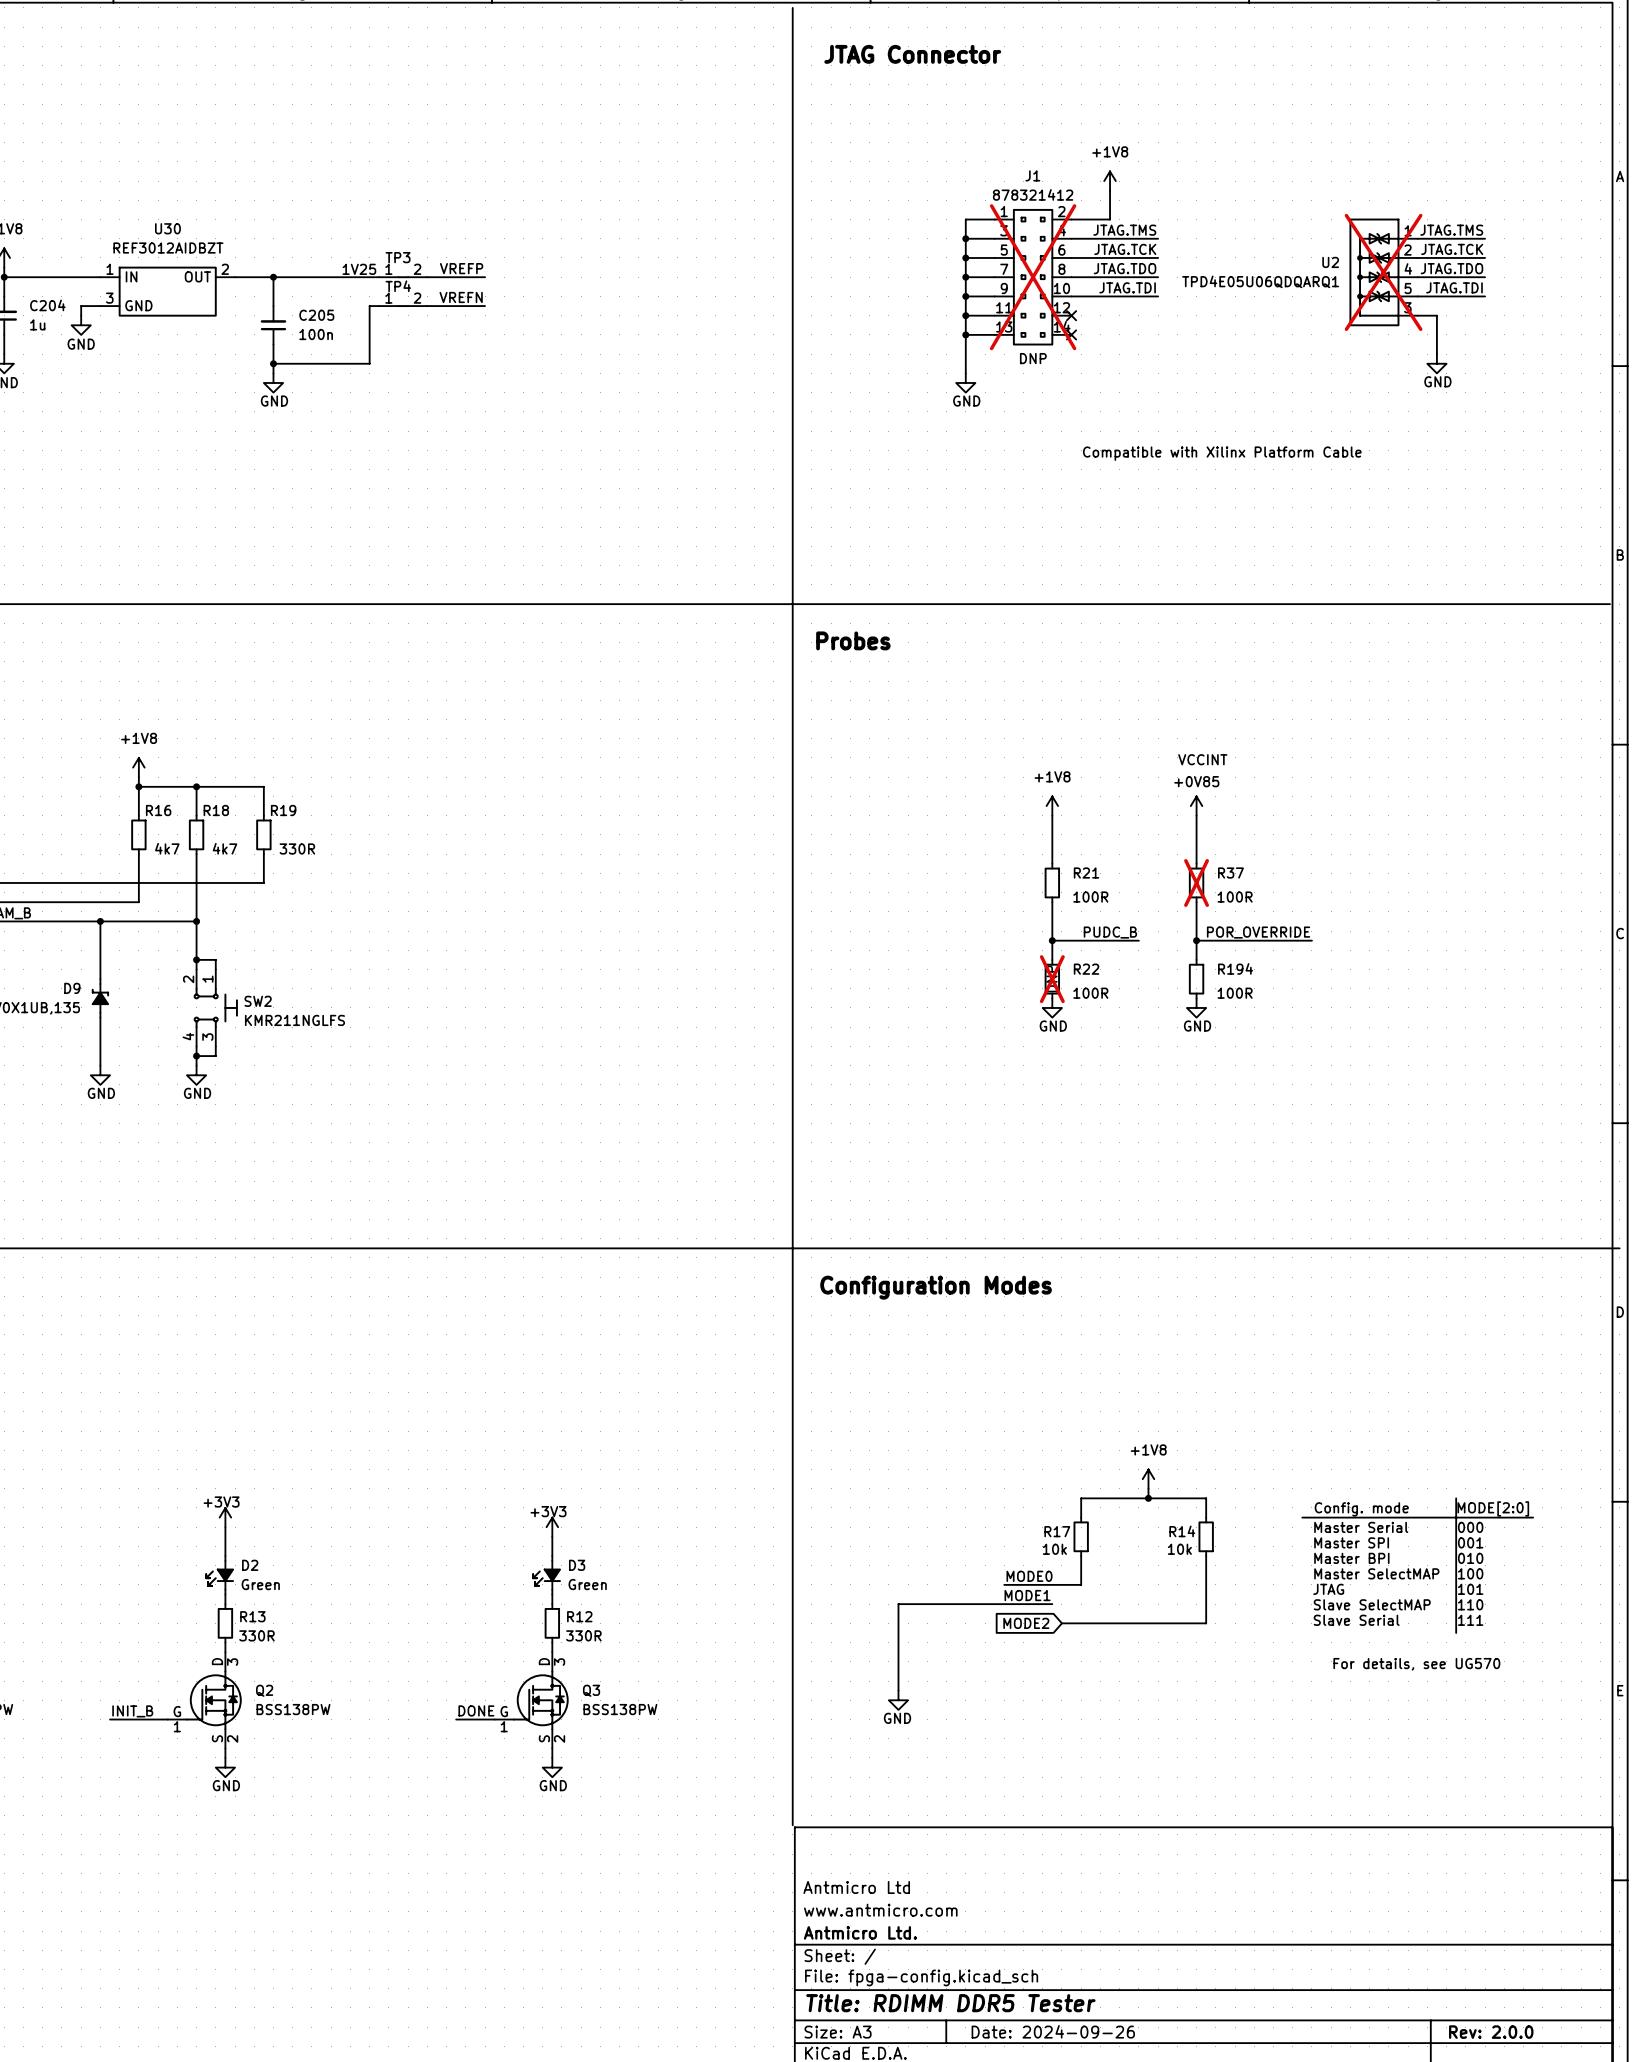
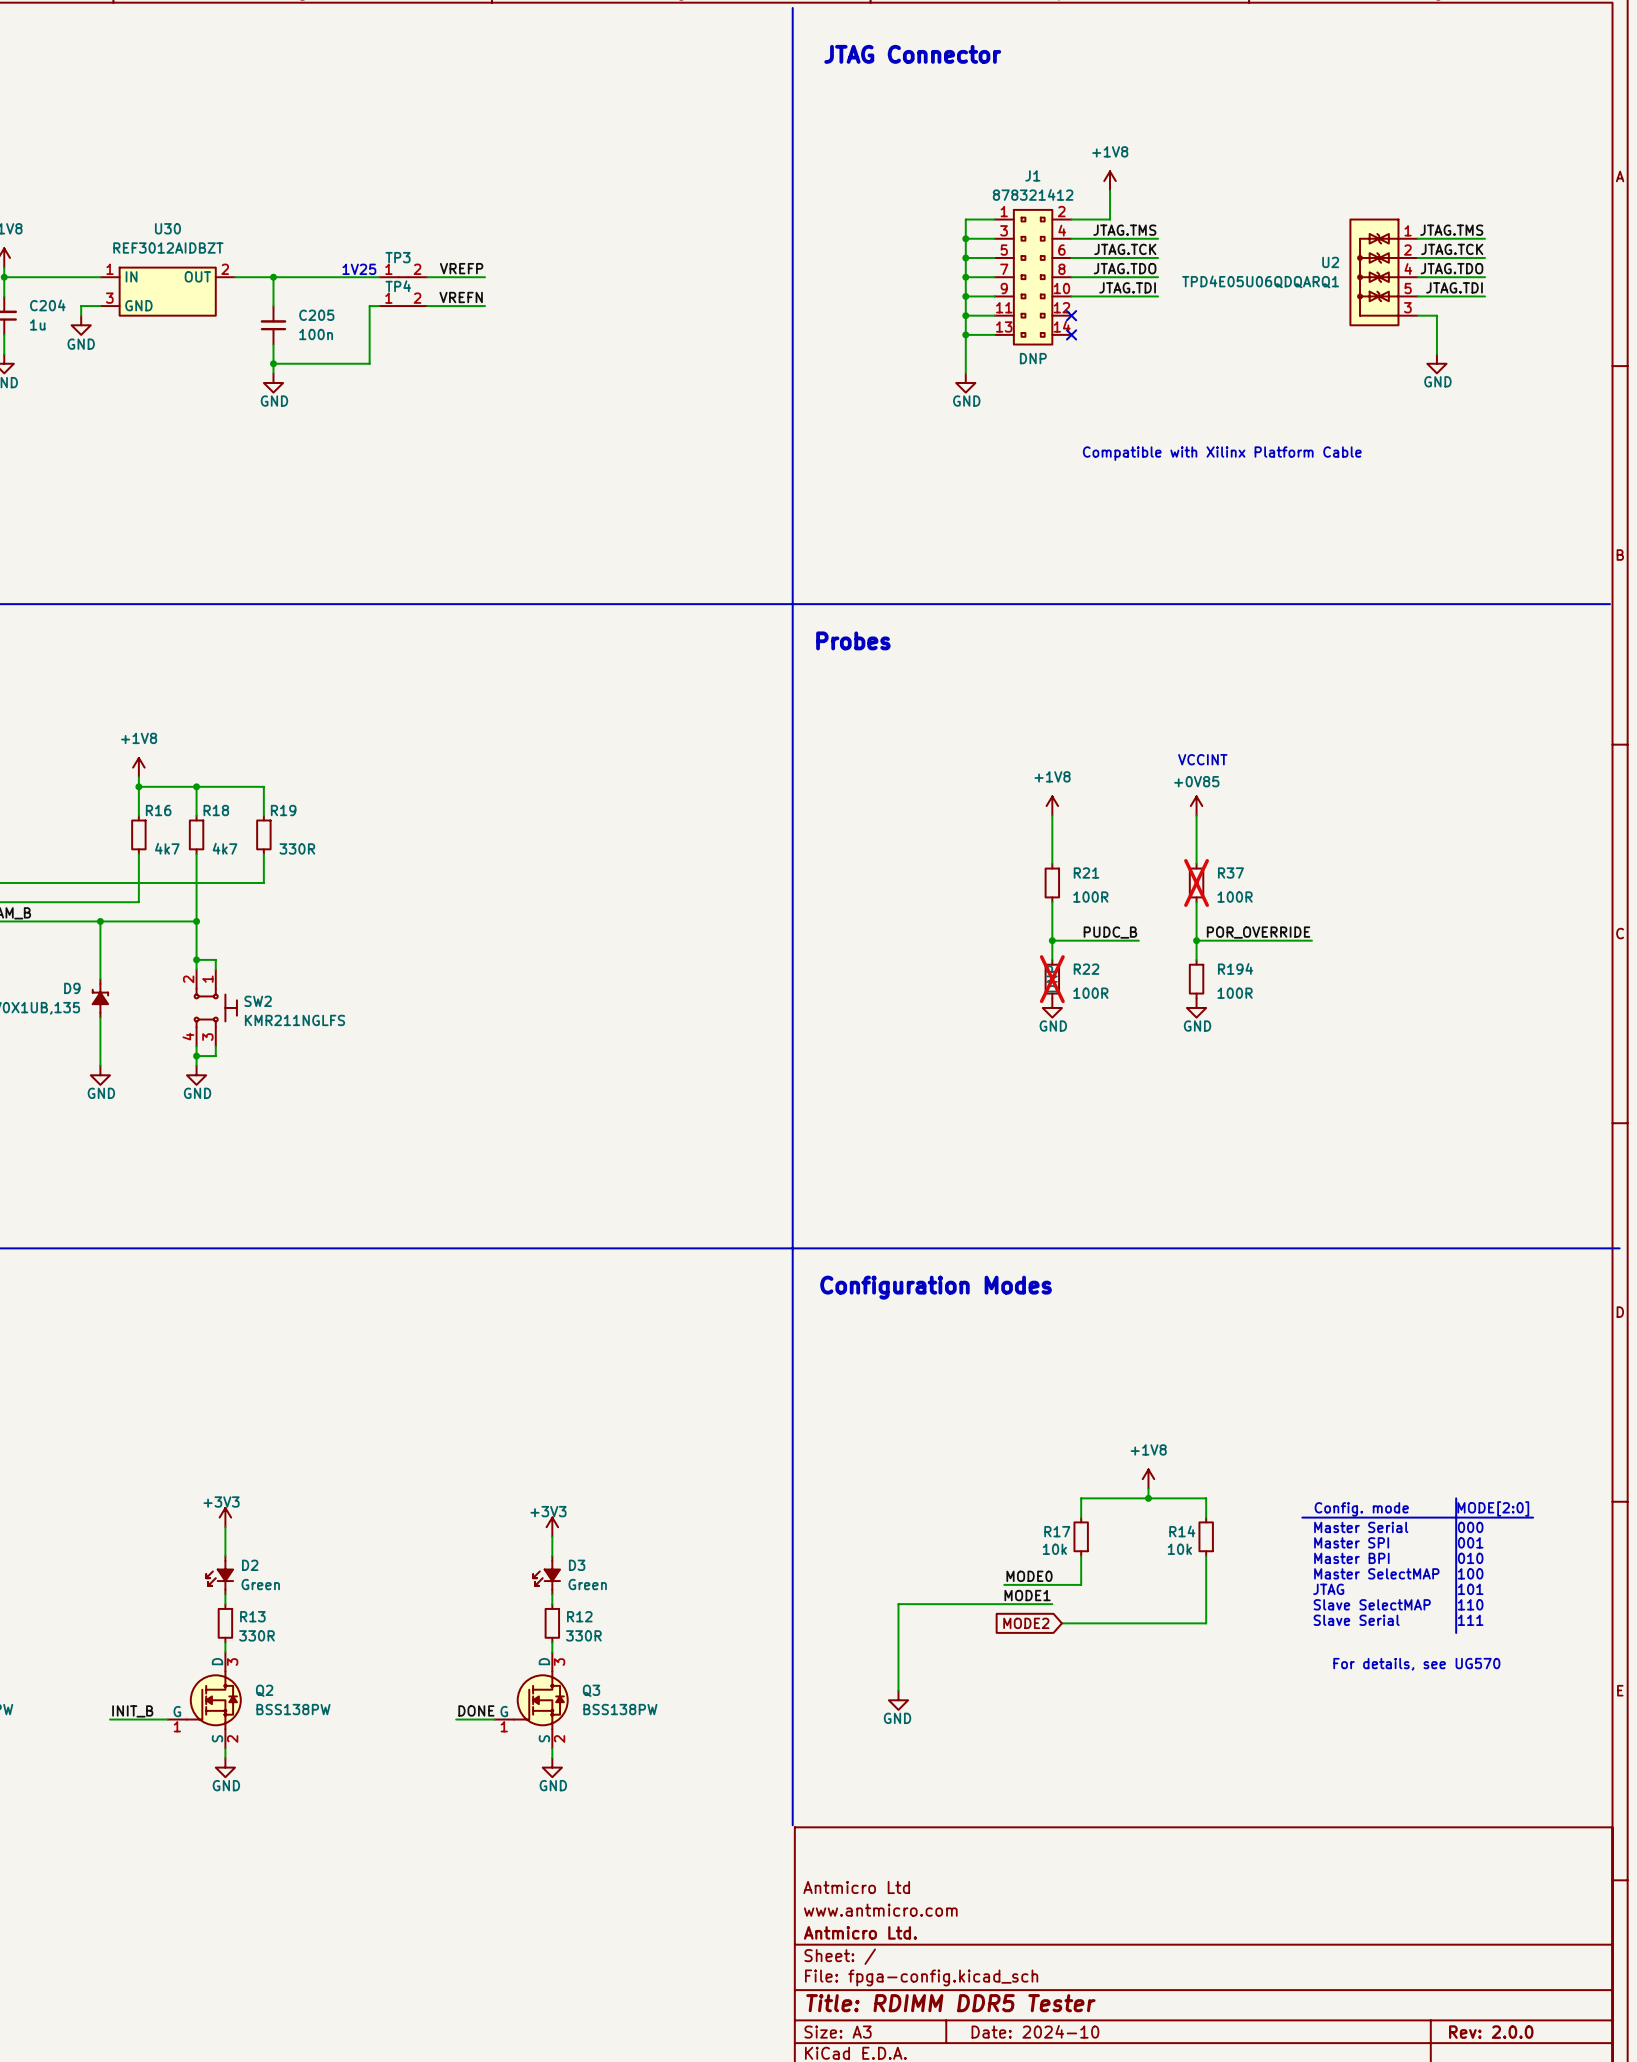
U2 do-not-place cross: (1383, 272) -> none
J1 do-not-place cross: (1033, 277) -> none
title block: Date: 2024-09-26 (1053, 2031) -> Date: 2024-10 (1035, 2031)

